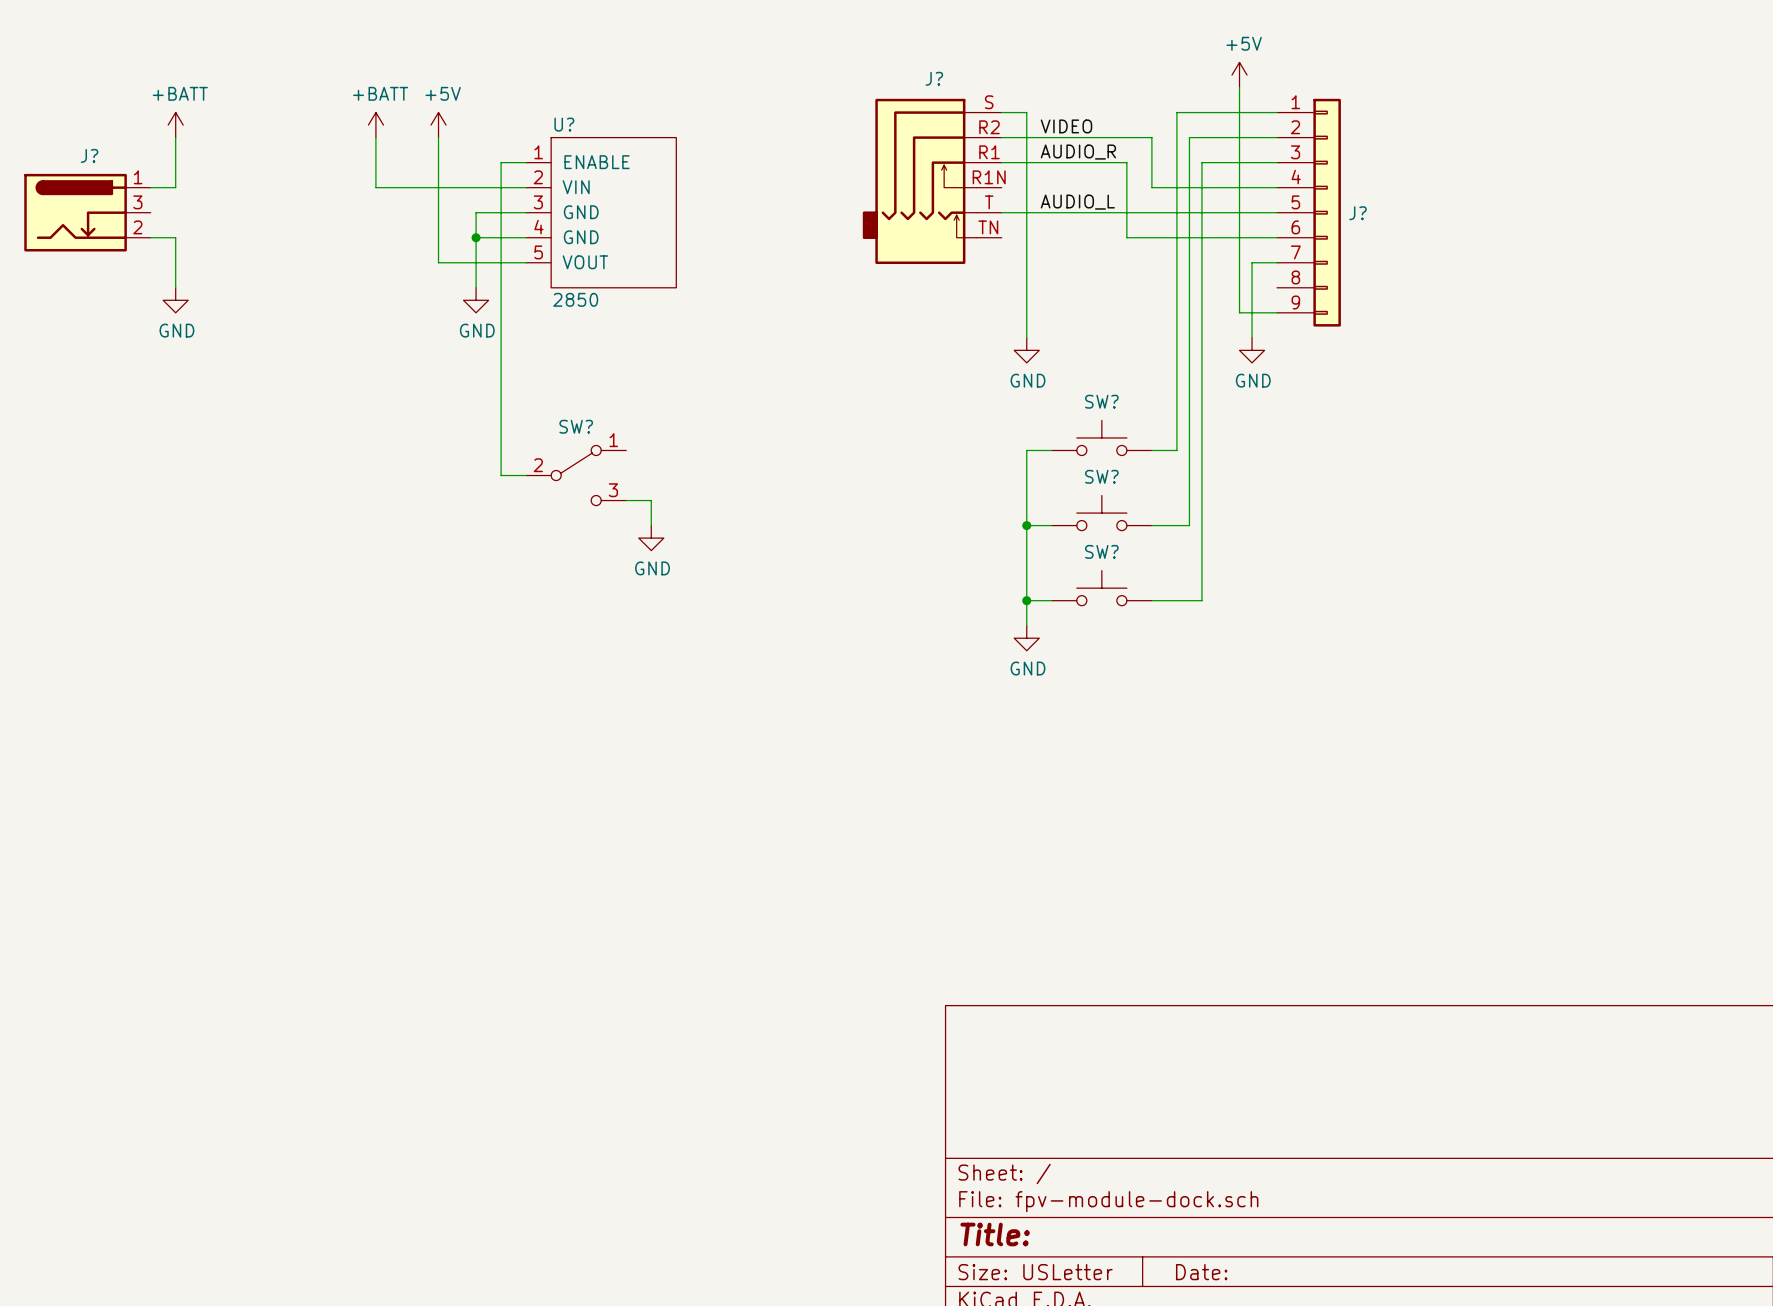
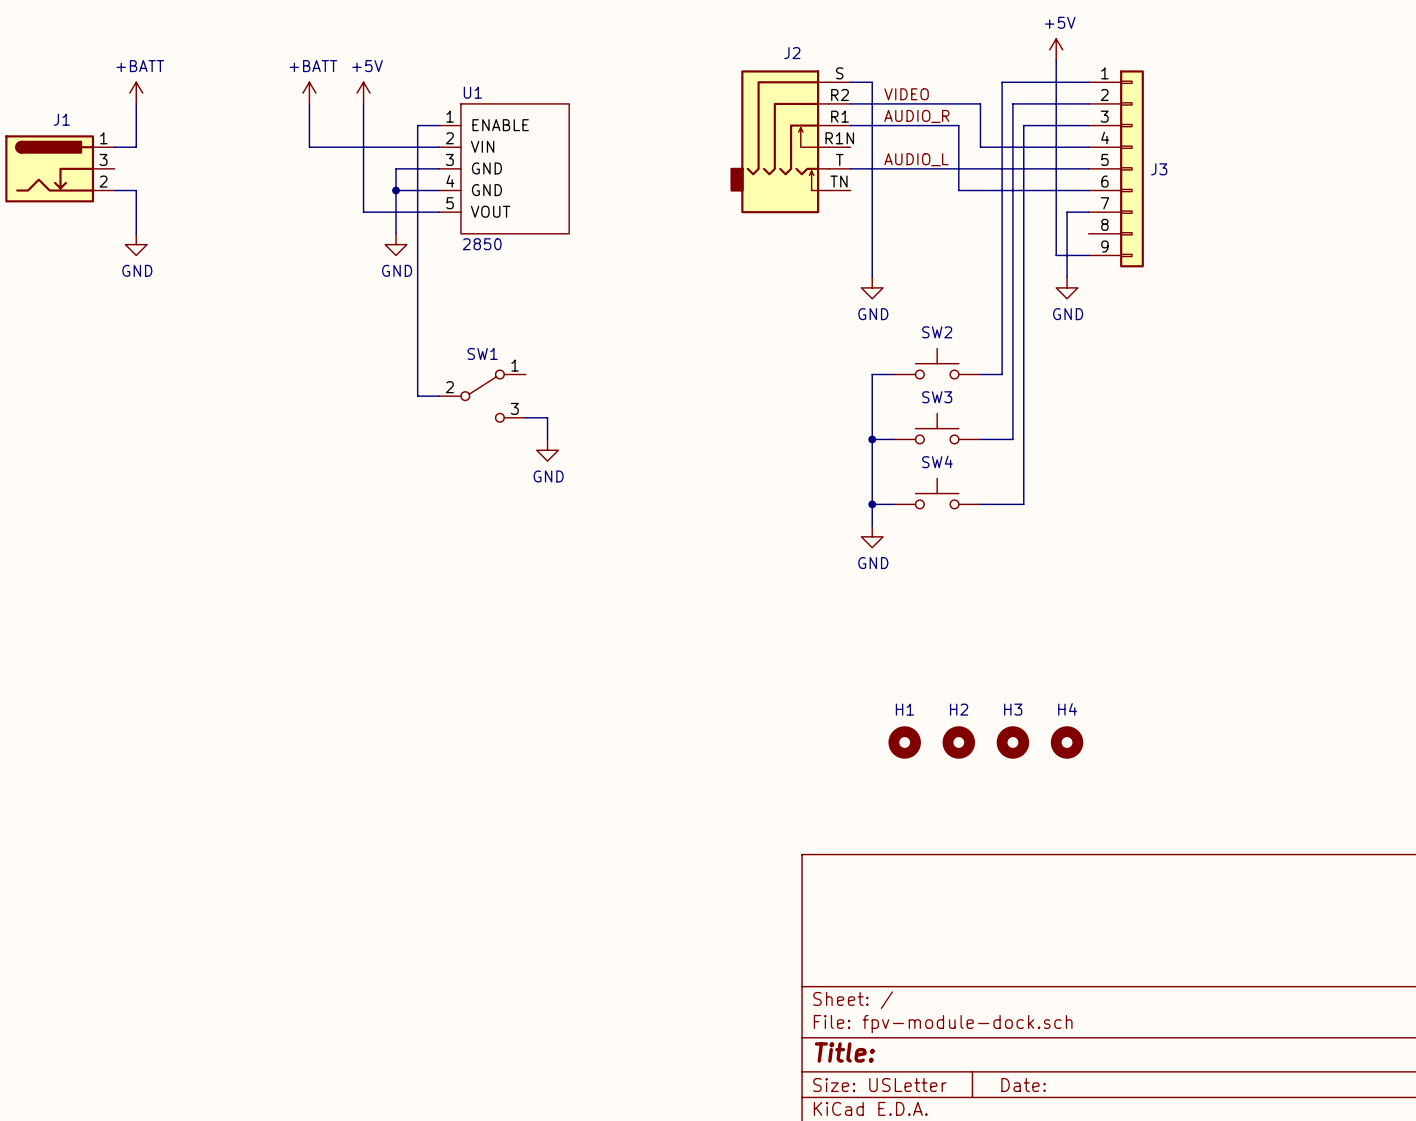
J? name: J? (934, 78) -> J2 (792, 53)
U? name: U? (564, 124) -> U1 (472, 92)
J? name: J? (89, 155) -> J1 (61, 119)
J? name: J? (1357, 213) -> J3 (1159, 169)
SW? name: SW? (1101, 401) -> SW2 (937, 332)
SW? name: SW? (576, 426) -> SW1 (482, 353)
SW? name: SW? (1101, 476) -> SW3 (937, 397)
SW? name: SW? (1101, 551) -> SW4 (937, 461)
H1: none -> (904, 742)
H2: none -> (958, 742)
H3: none -> (1012, 742)
H4: none -> (1067, 742)

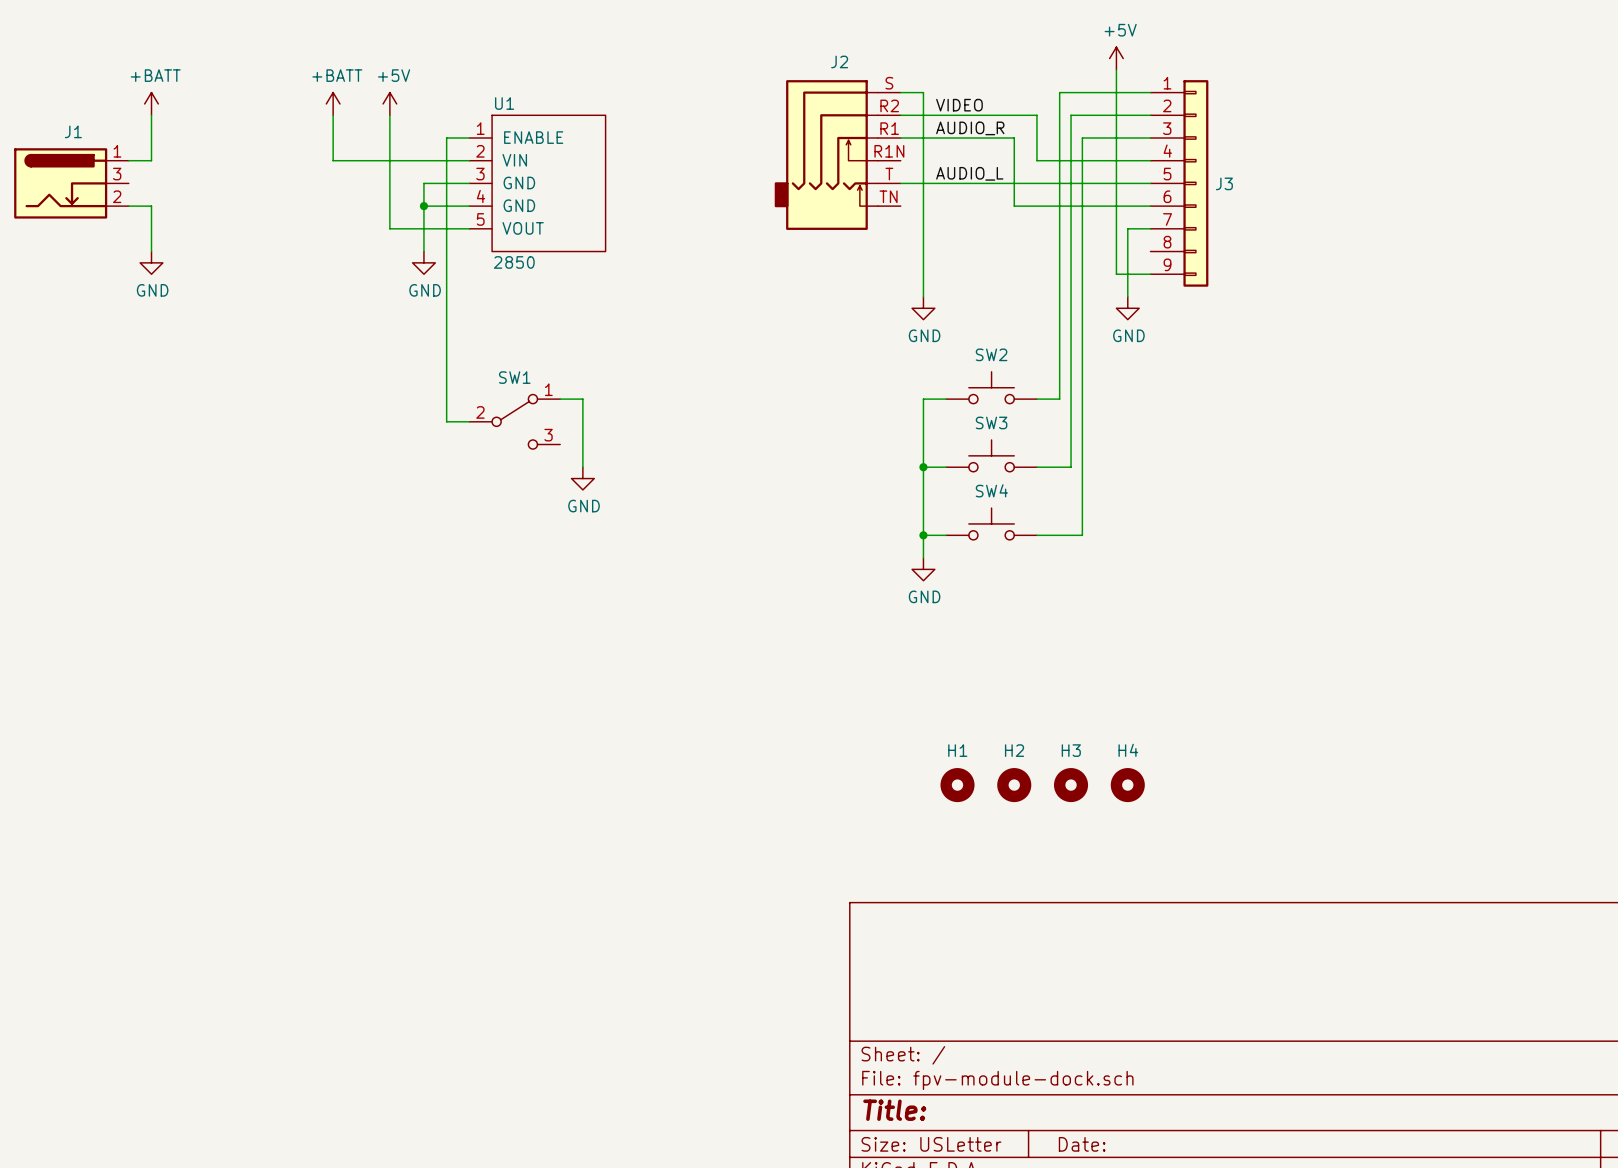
wire: (525, 417) (547, 417) -> (560, 399) (582, 399) (582, 444)

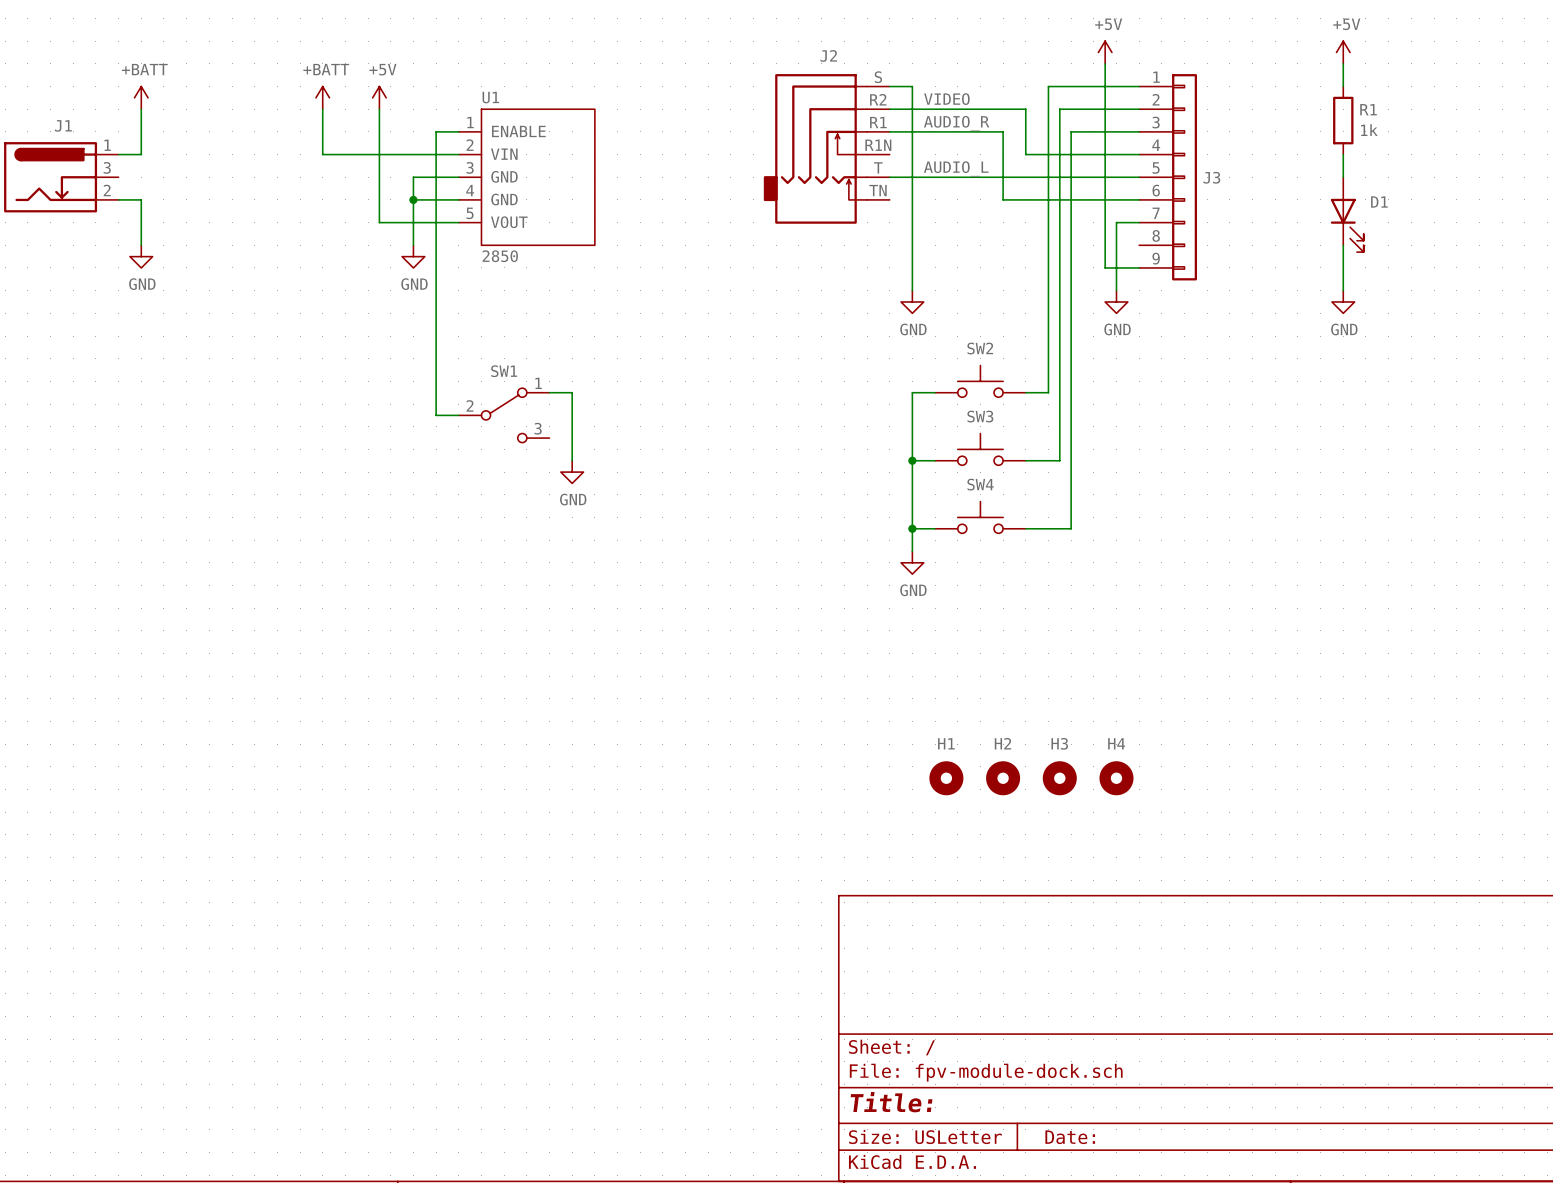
power symbol: none -> +5V (1343, 52)
wire: none -> (1343, 63) (1343, 86)
R1: none -> 1k (1343, 120)
wire: none -> (1343, 154) (1343, 177)
D1: none -> (1347, 214)
wire: none -> (1343, 245) (1343, 290)
power symbol: none -> GND (1343, 301)

